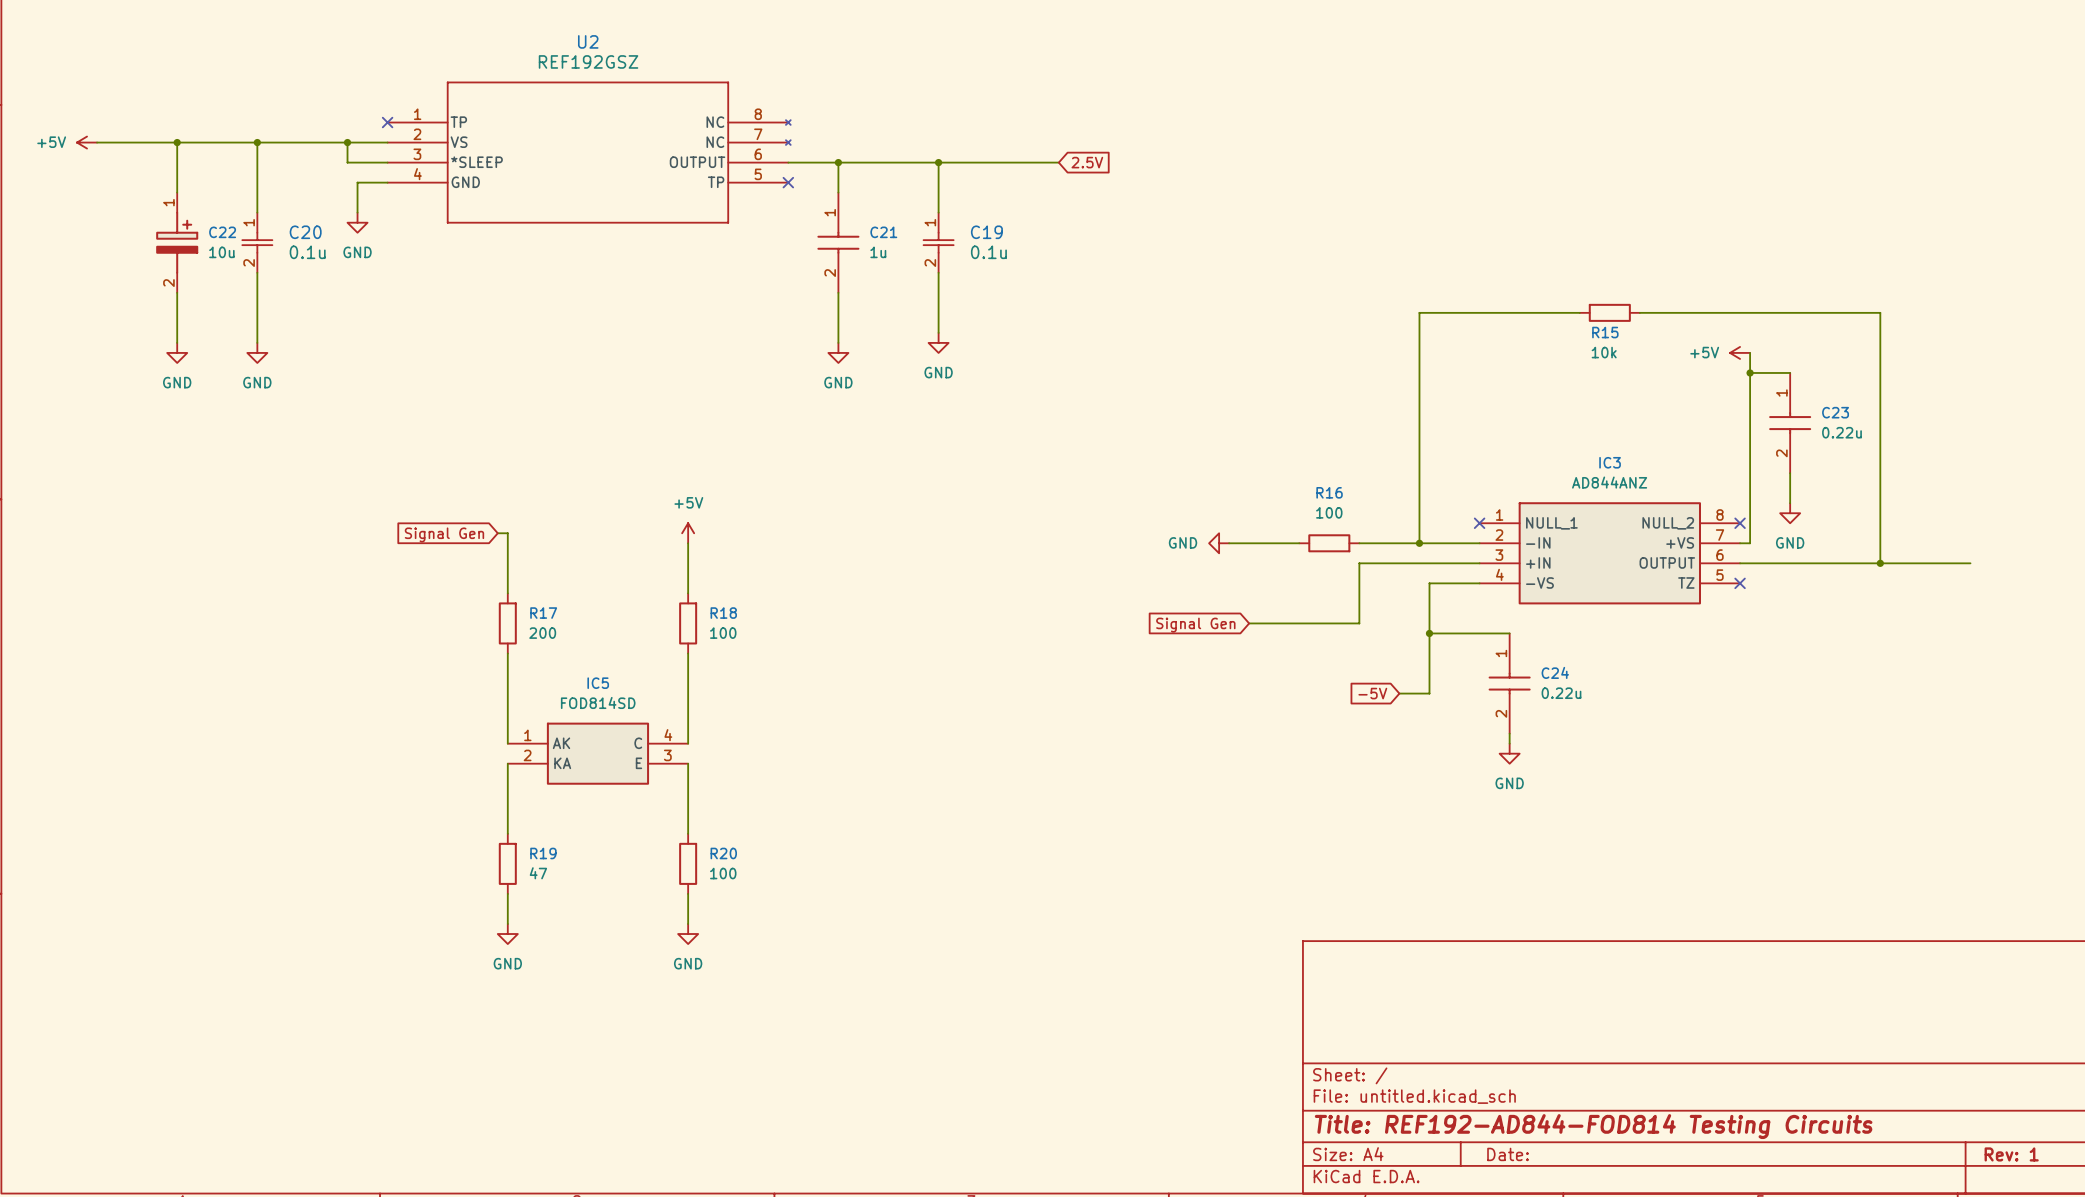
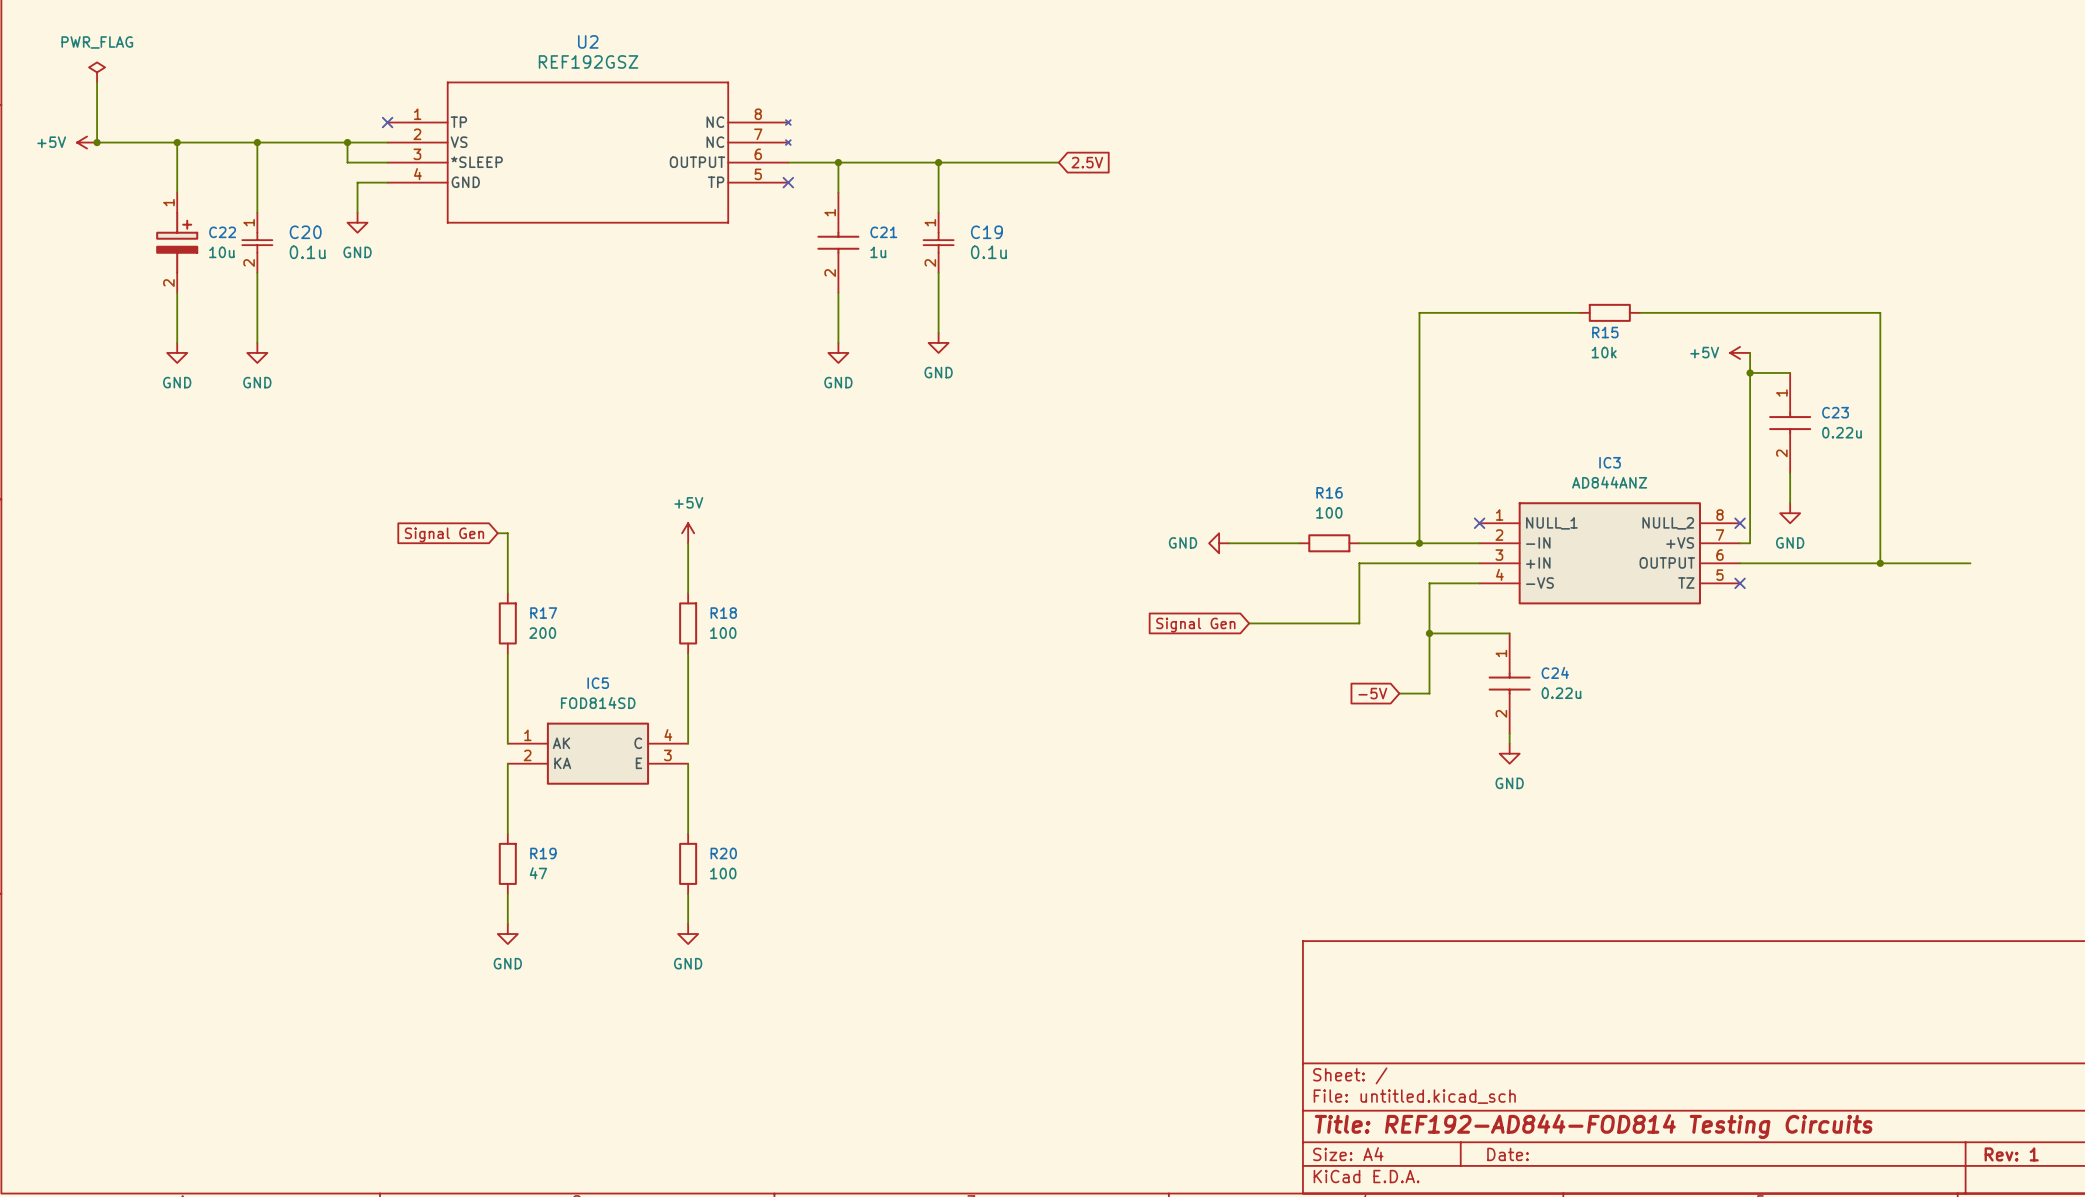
power symbol: none -> PWR_FLAG (97, 72)
wire: none -> (97, 82) (97, 142)
junction: none -> (97, 142)

